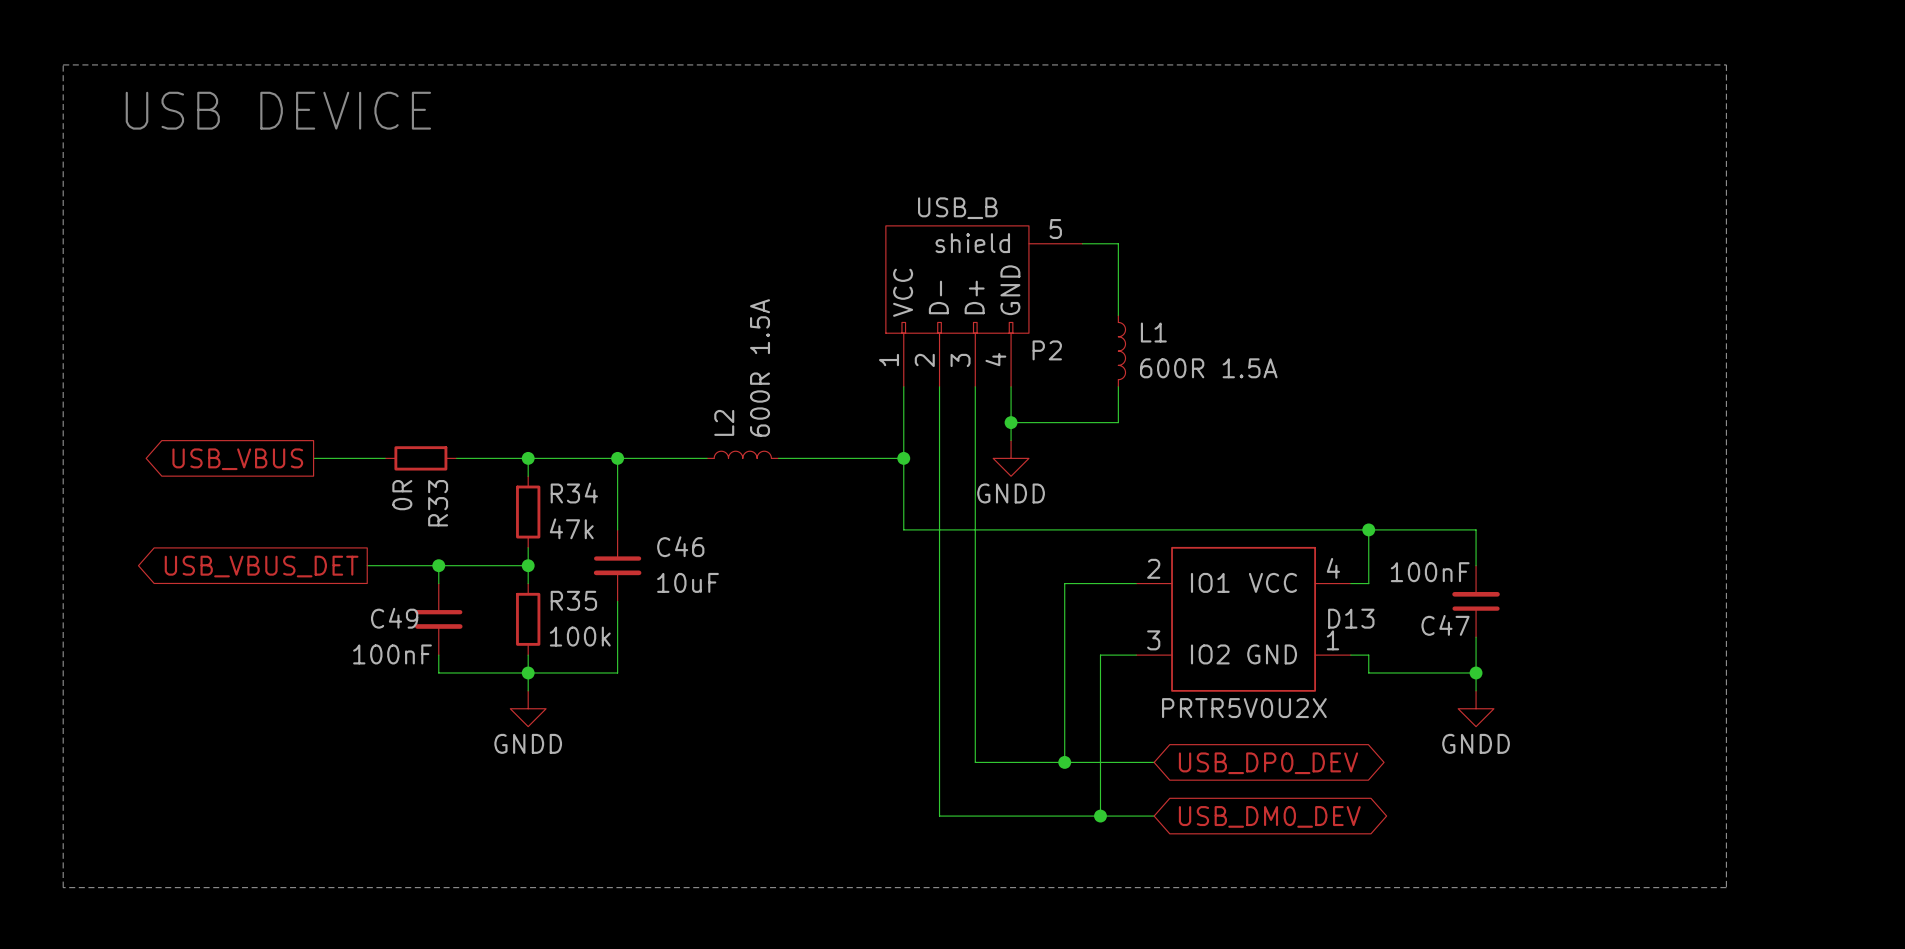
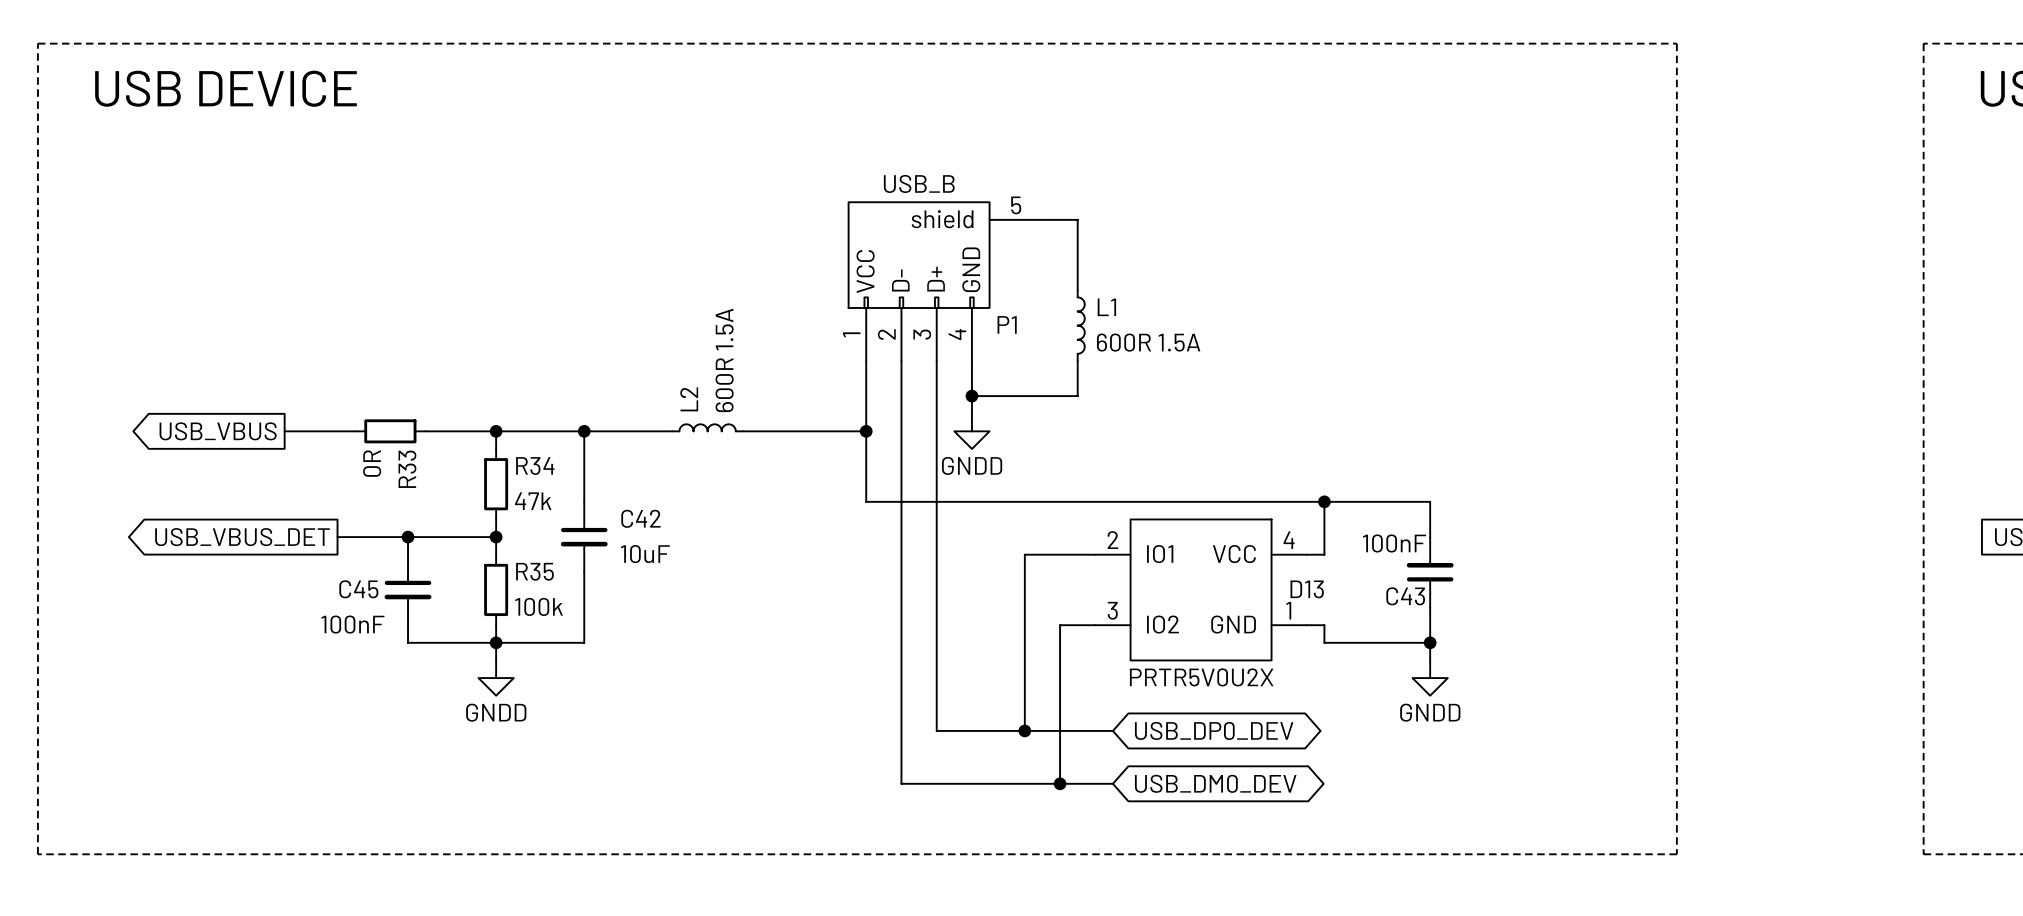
P2 name: P2 (1047, 350) -> P1 (1007, 324)
C46 name: C46 (680, 546) -> C42 (640, 518)
C49 name: C49 (394, 618) -> C45 (358, 589)
C47 name: C47 (1445, 625) -> C43 (1405, 596)

